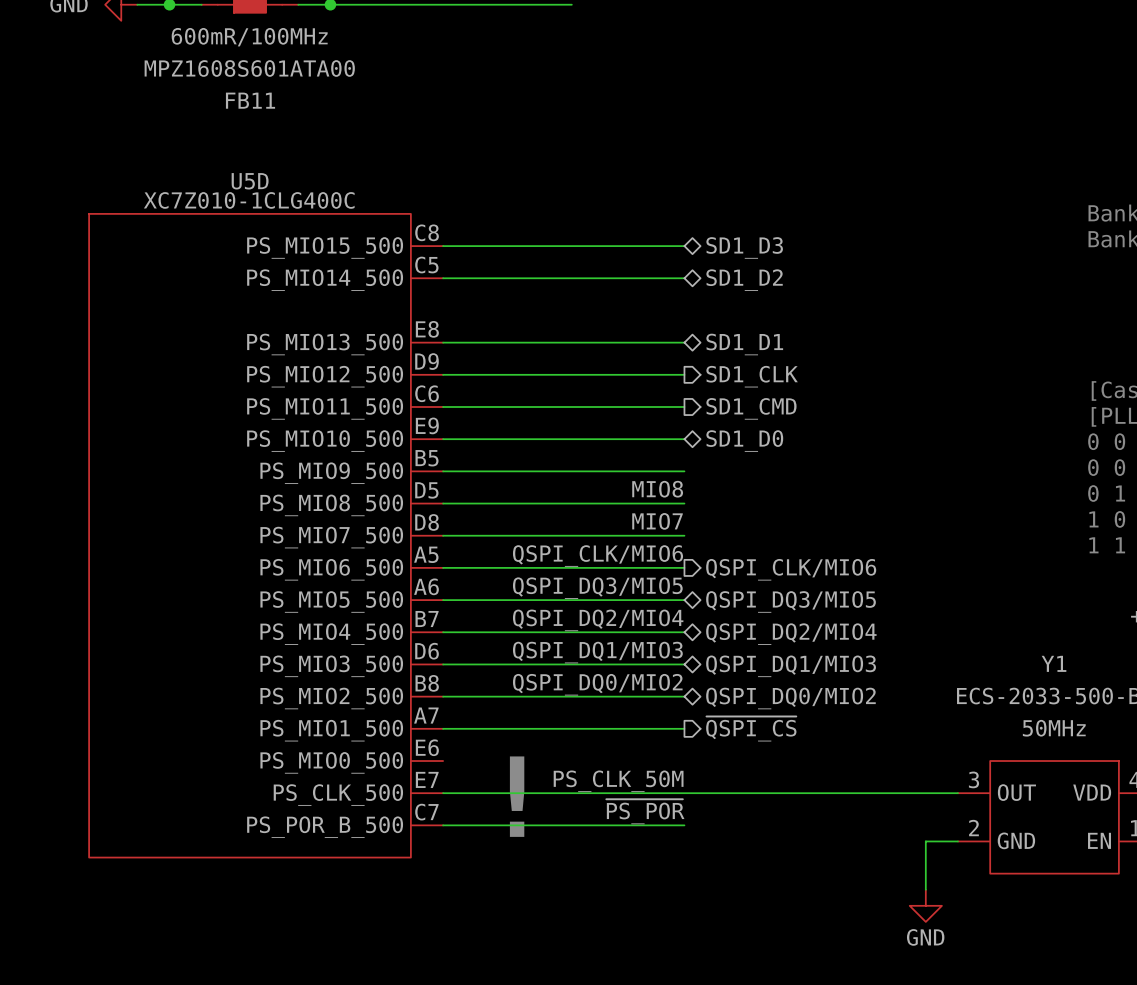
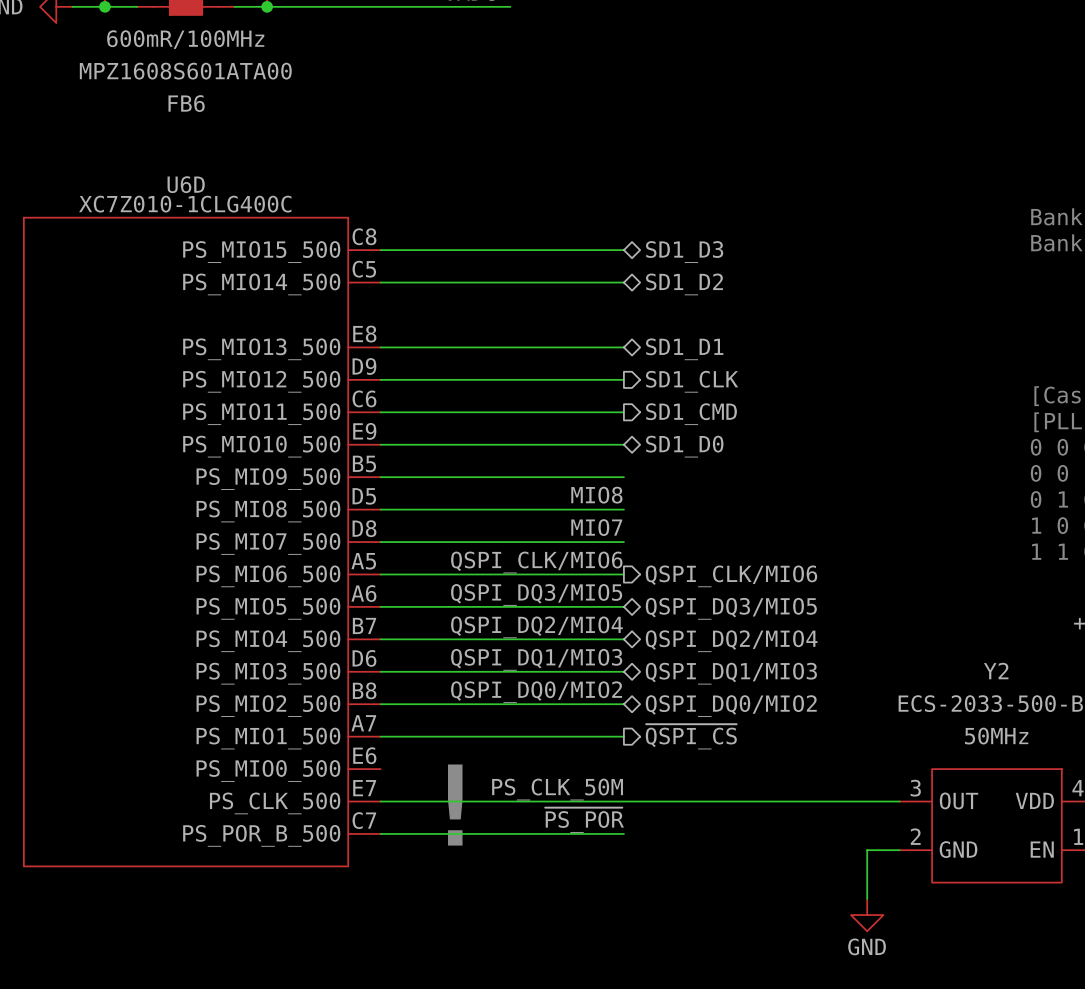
FB11 name: FB11 (250, 100) -> FB6 (186, 103)
U5D name: U5D (250, 181) -> U6D (186, 184)
Y1 name: Y1 (1054, 663) -> Y2 (996, 671)

